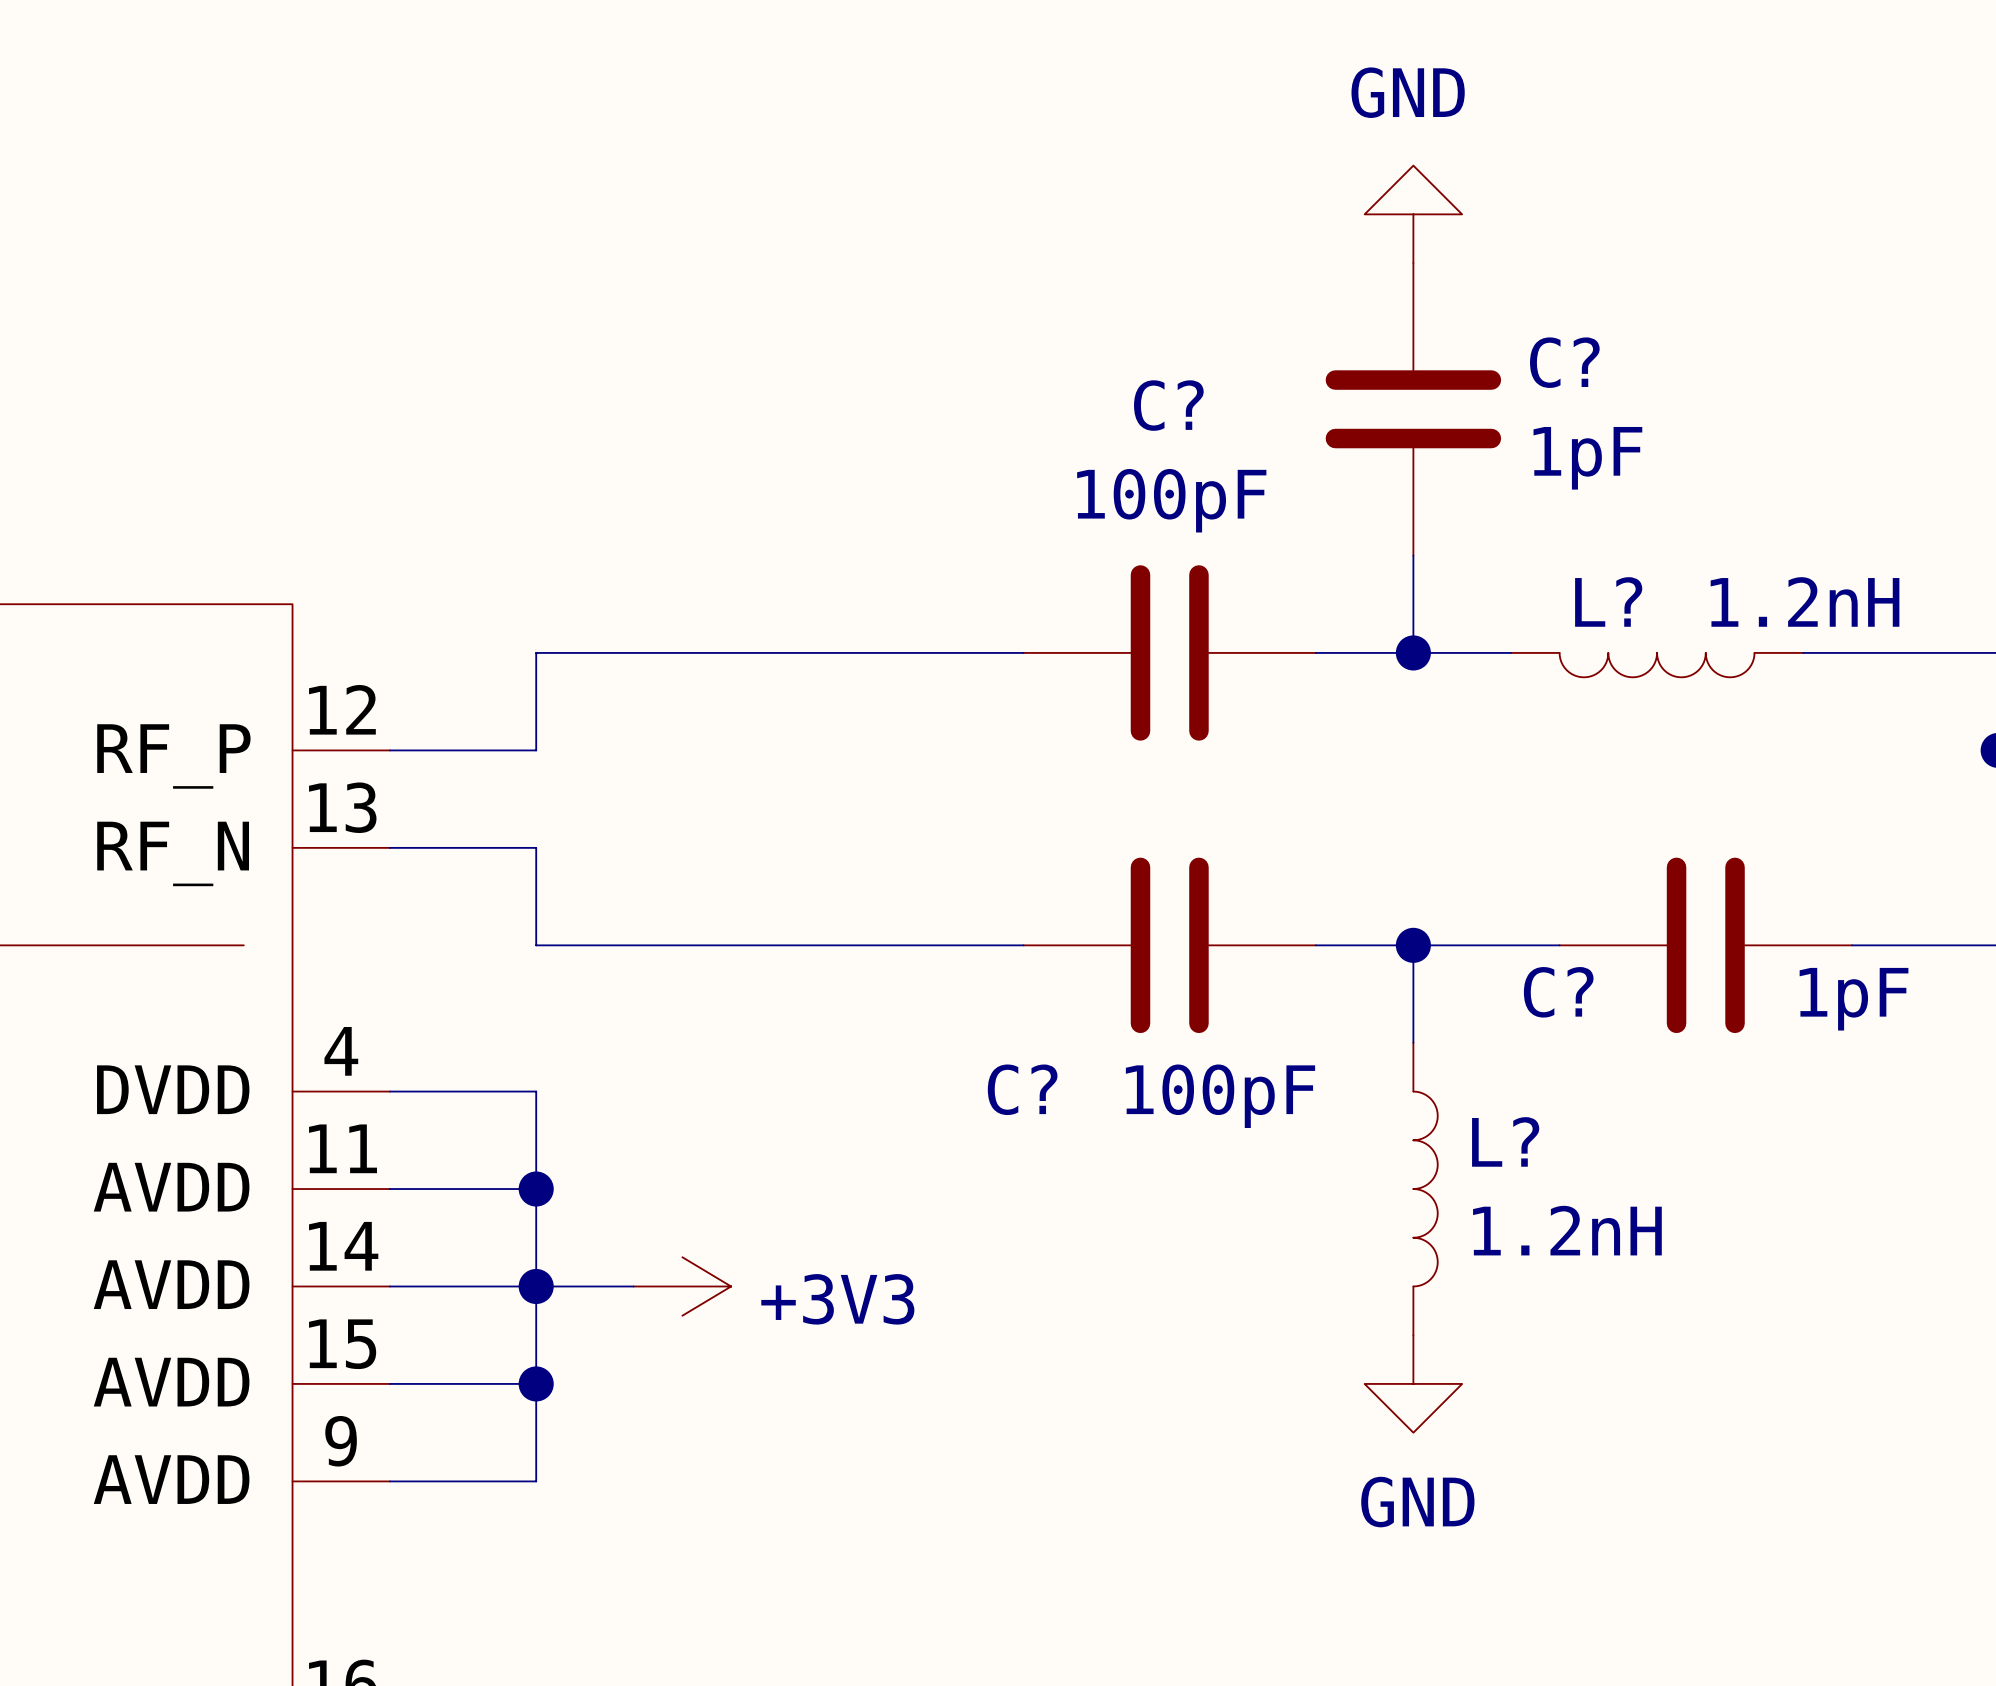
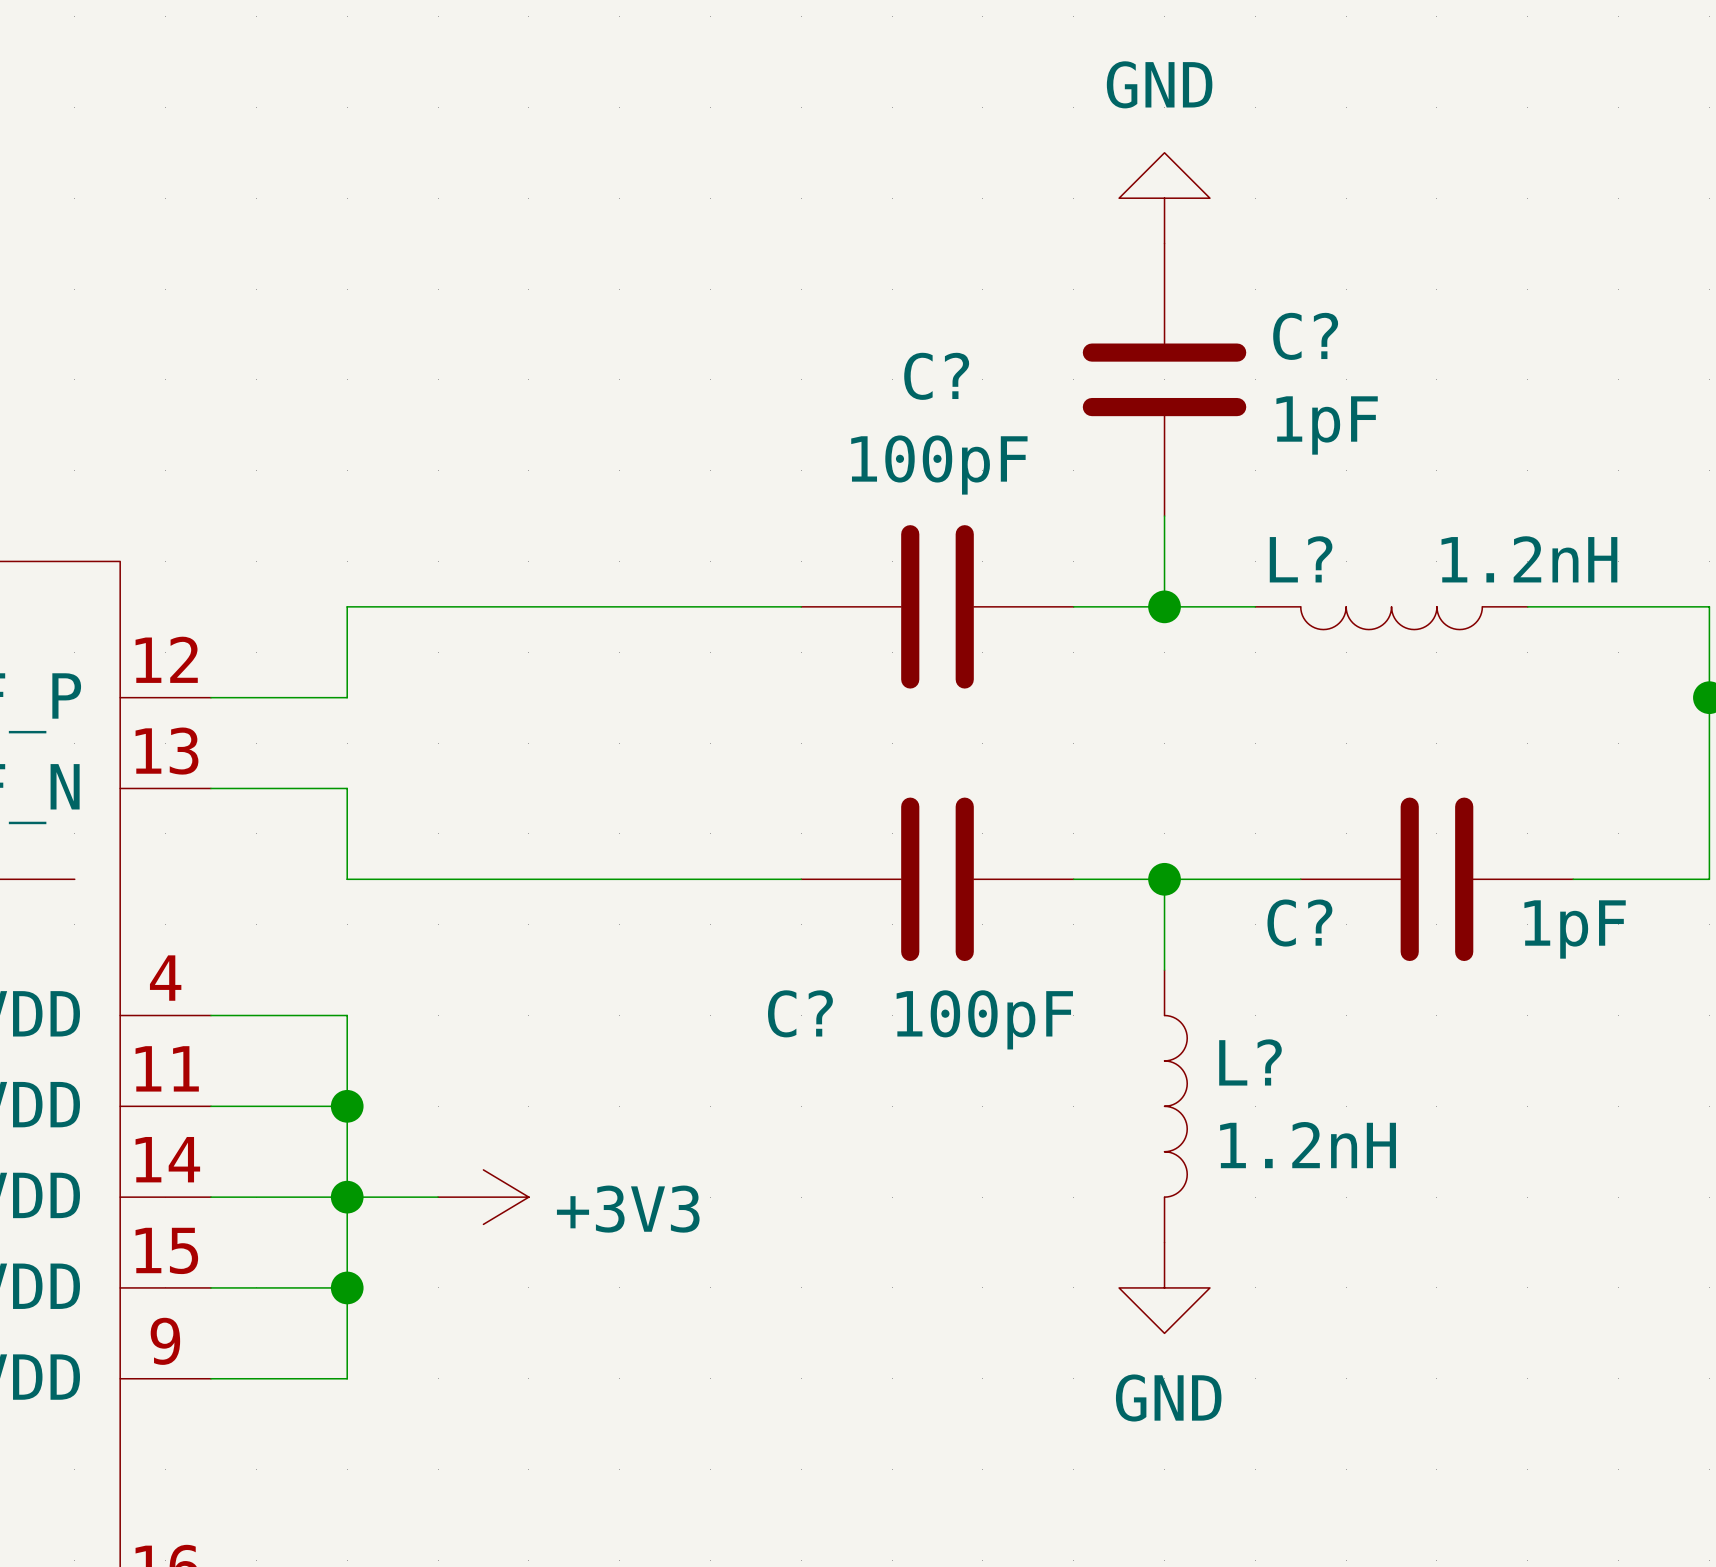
L? name position: L? (1608, 601) -> L? (1301, 559)

